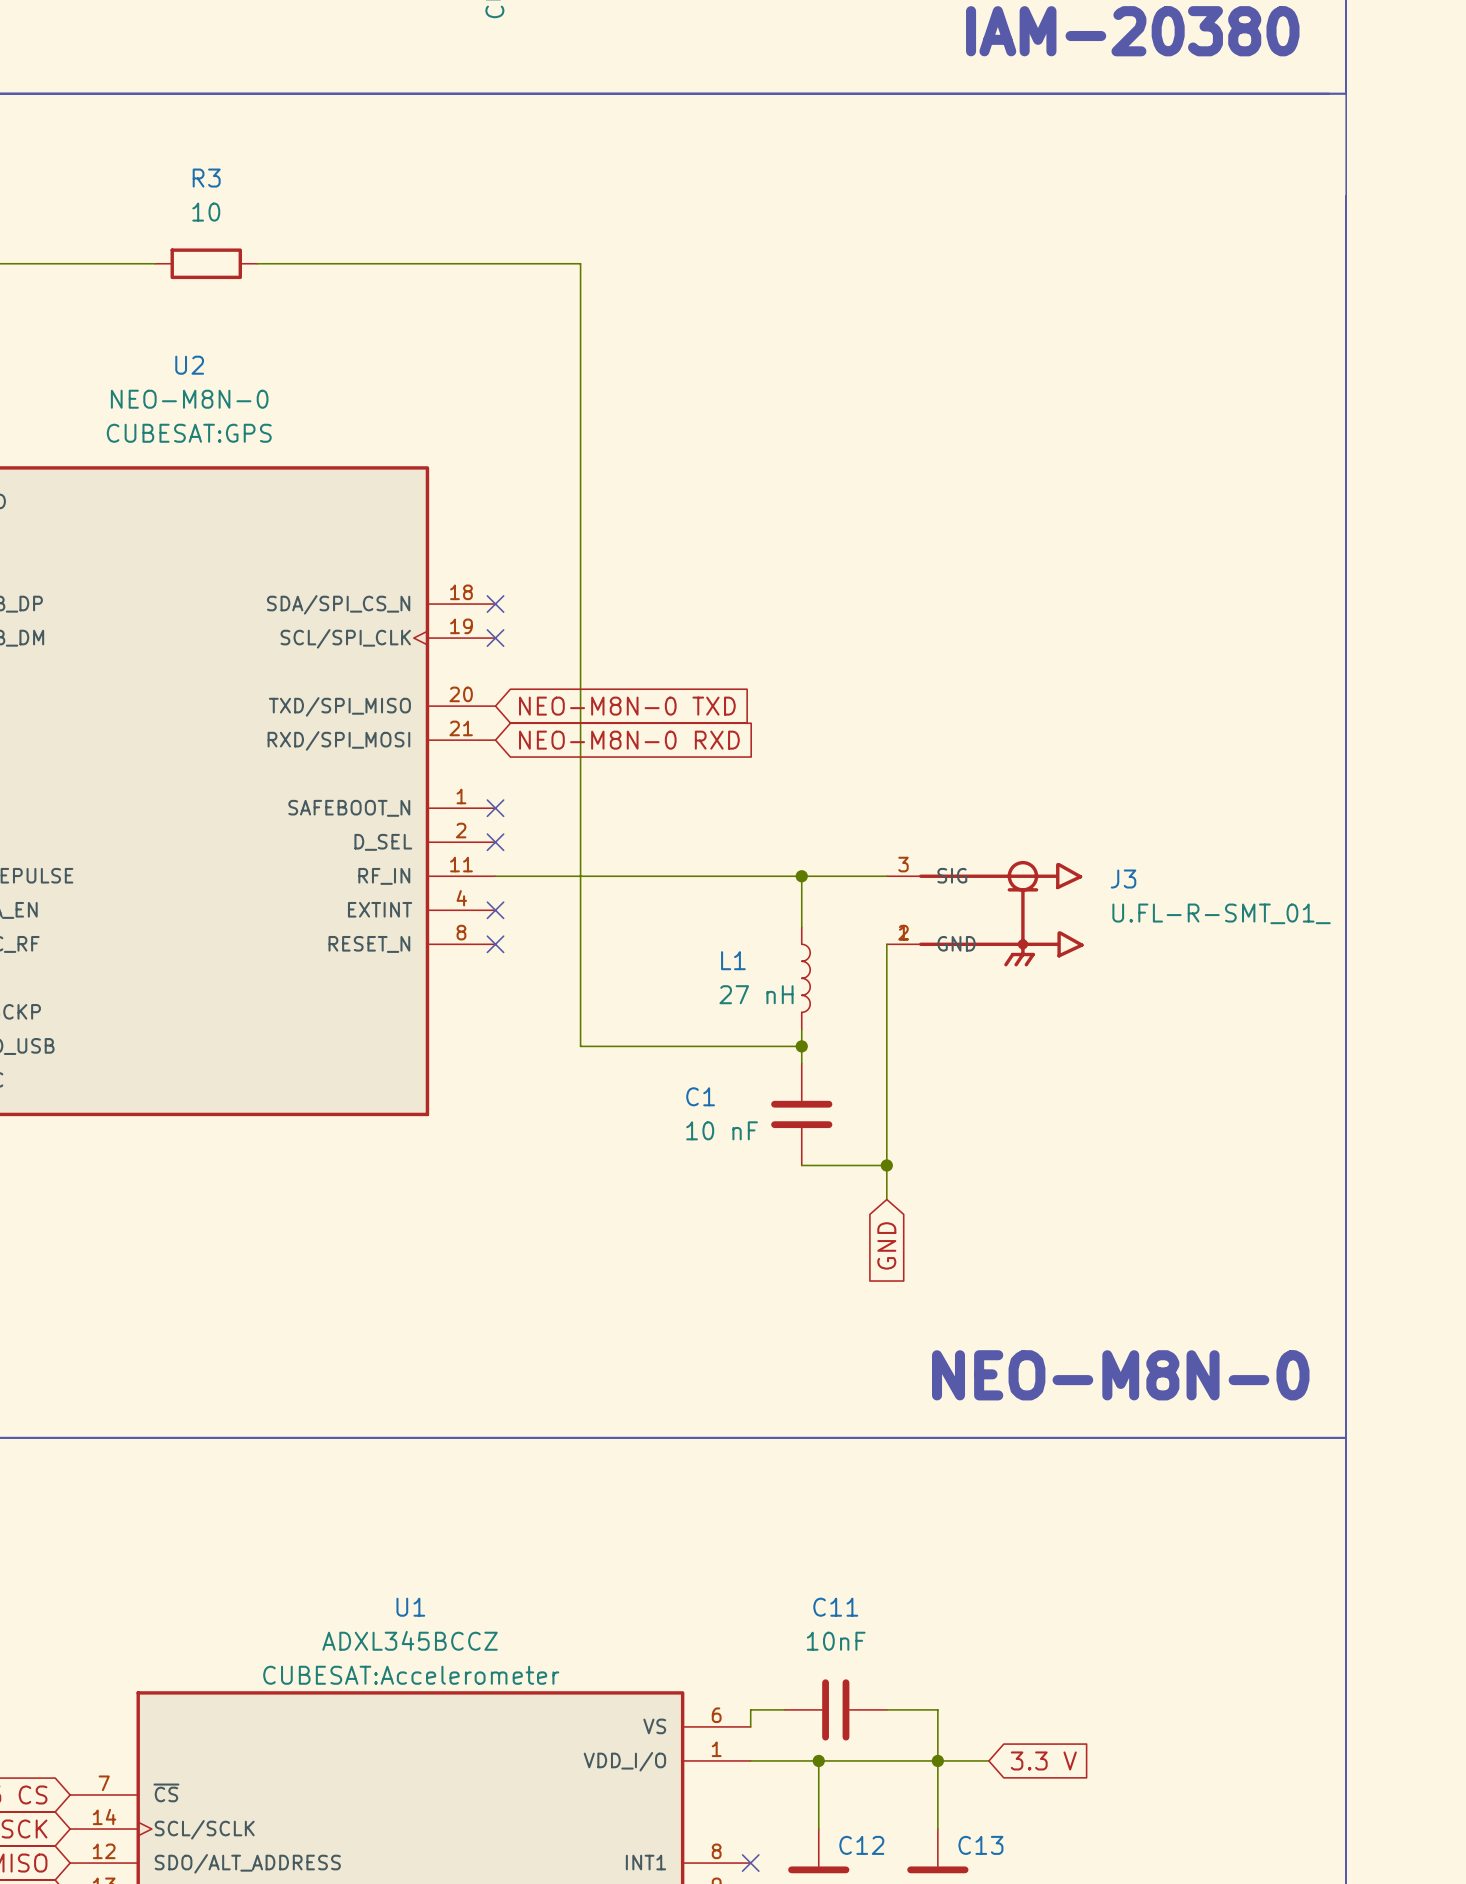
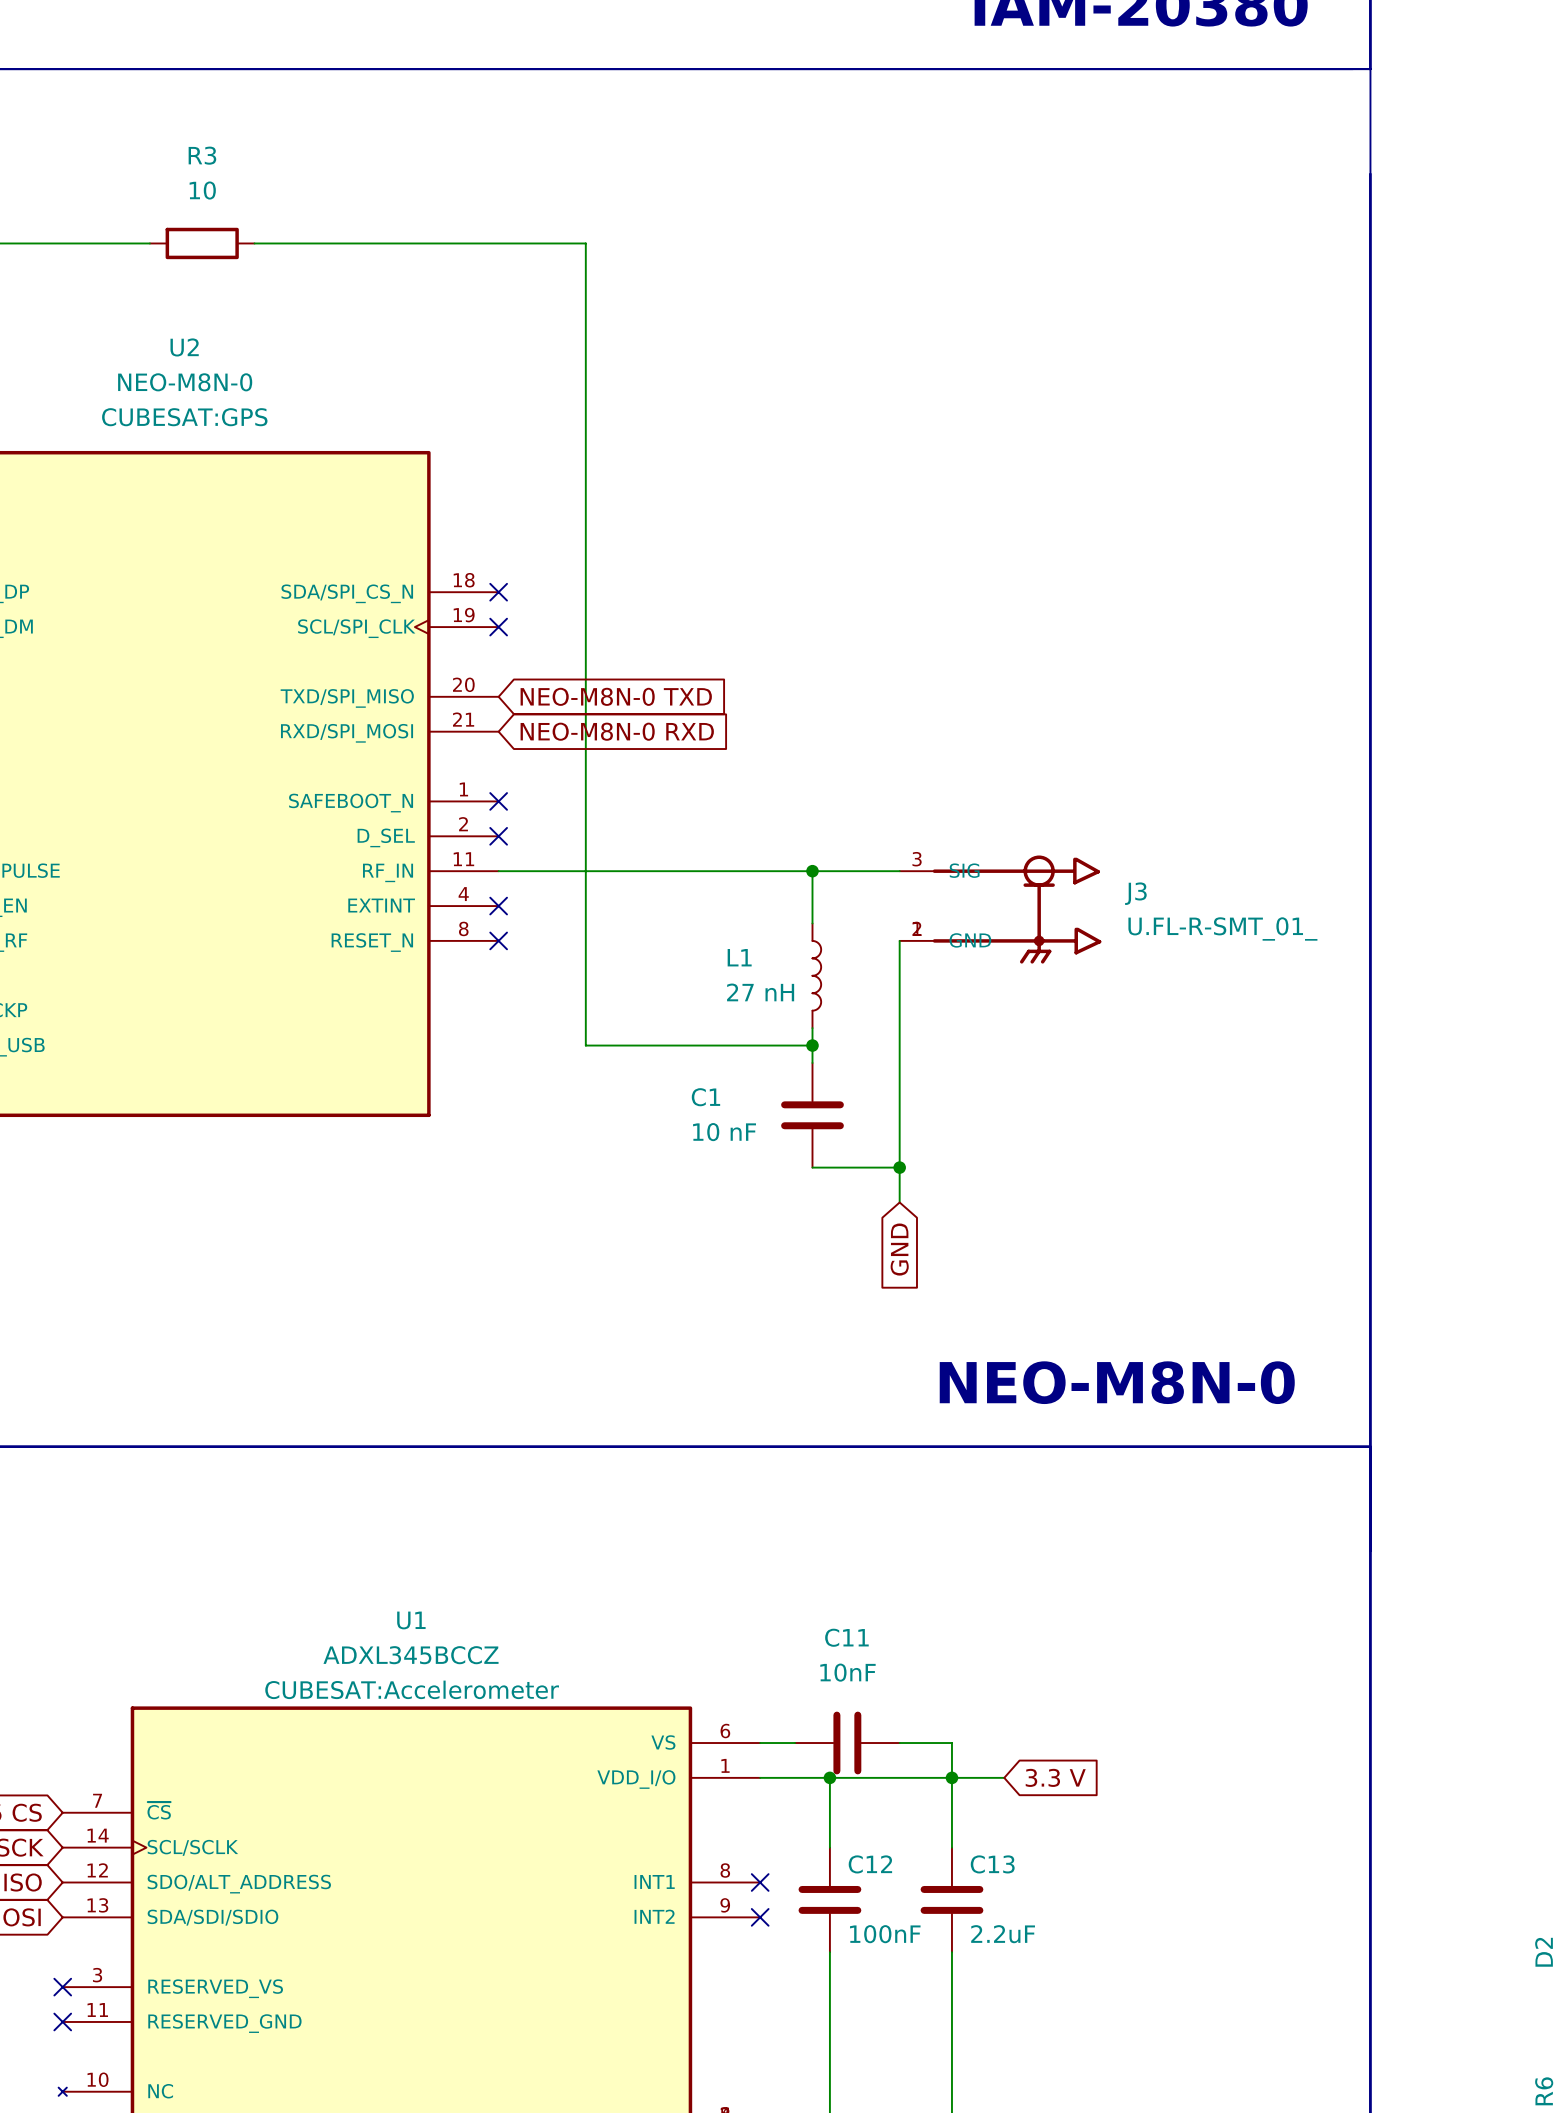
J3 name position: J3 (1123, 879) -> J3 (1135, 893)
J3 value position: U.FL-R-SMT_01_ (1221, 913) -> U.FL-R-SMT_01_ (1222, 928)
wire: (784, 1709) (750, 1709) (750, 1726) -> (795, 1743) (760, 1743)
C11 position: (835, 1709) -> (847, 1743)
wire: (886, 1709) (937, 1709) (937, 1726) -> (899, 1743) (951, 1743)

